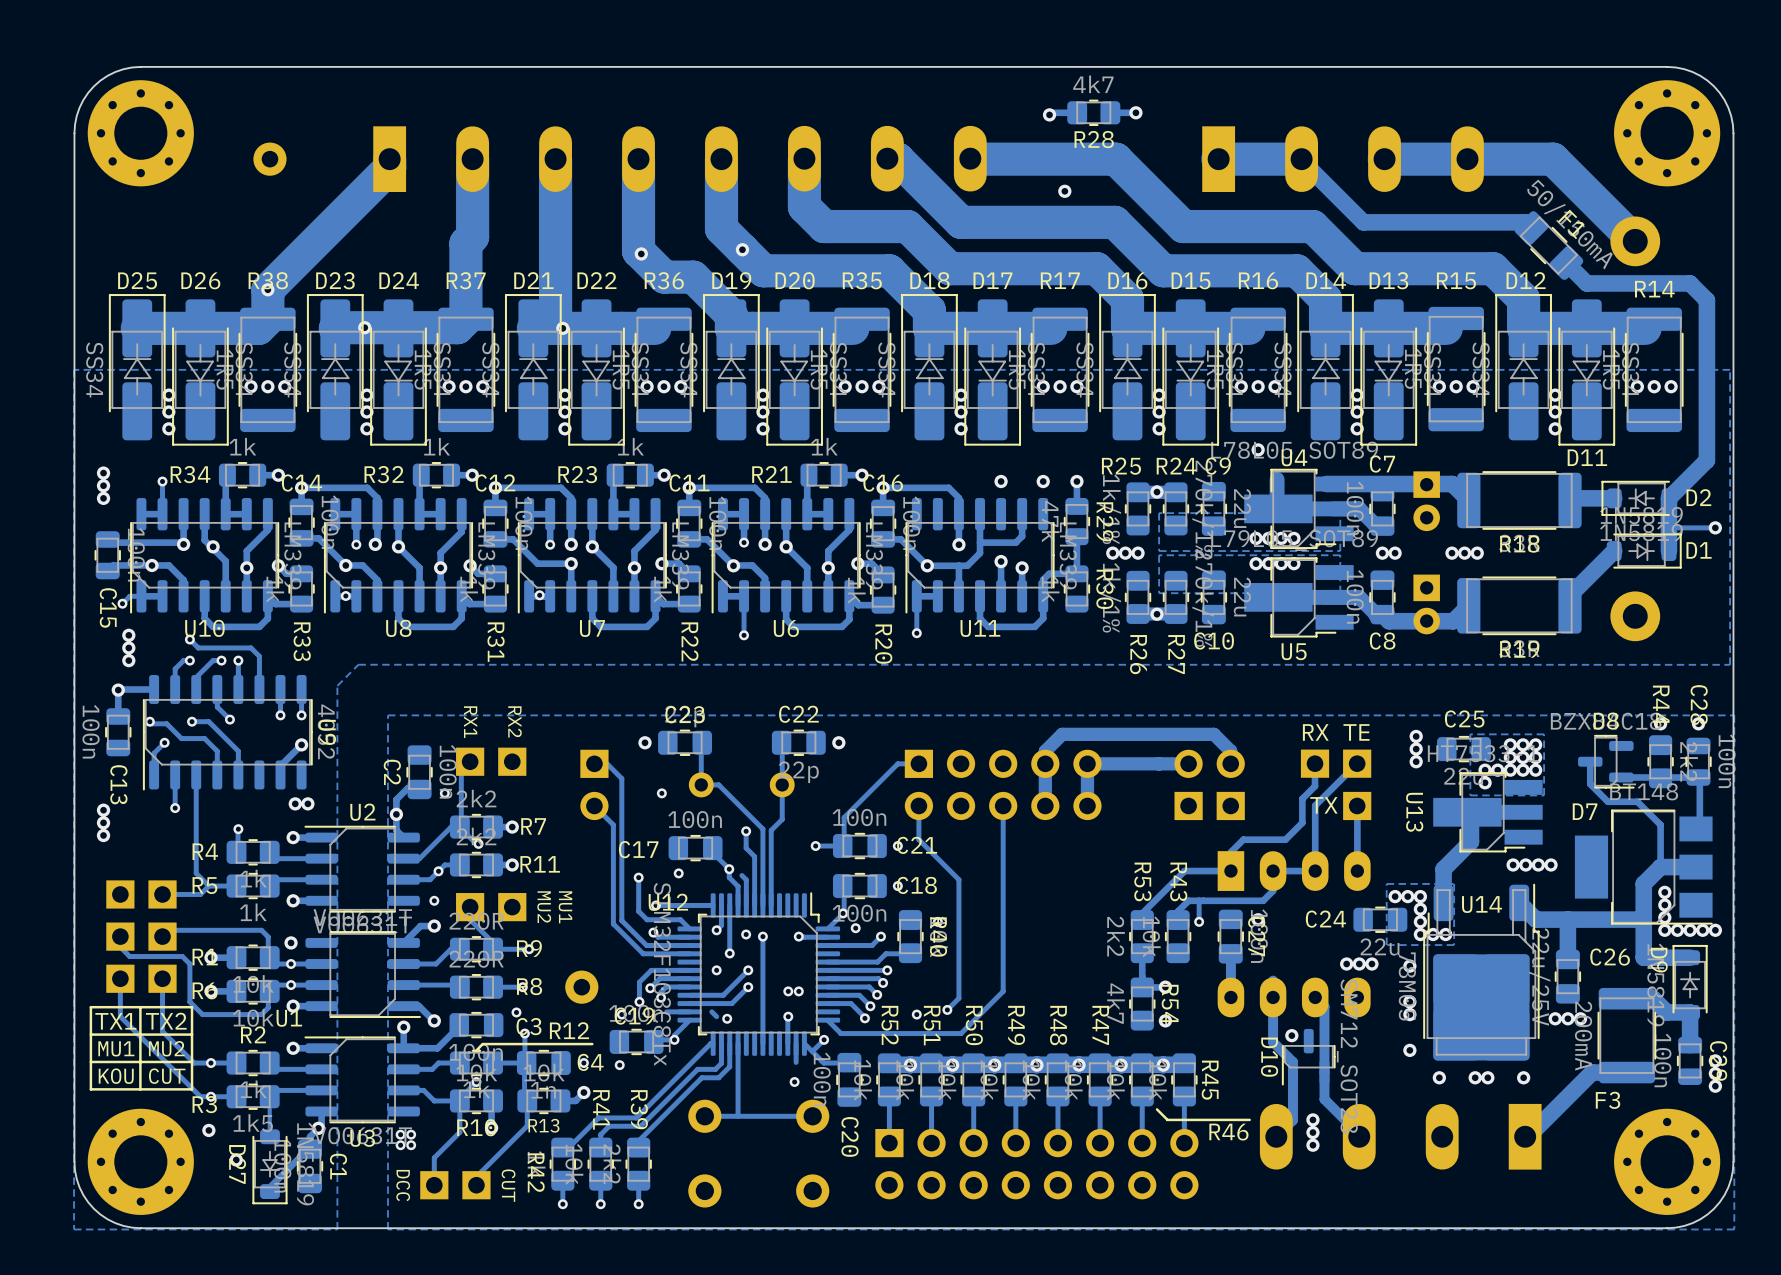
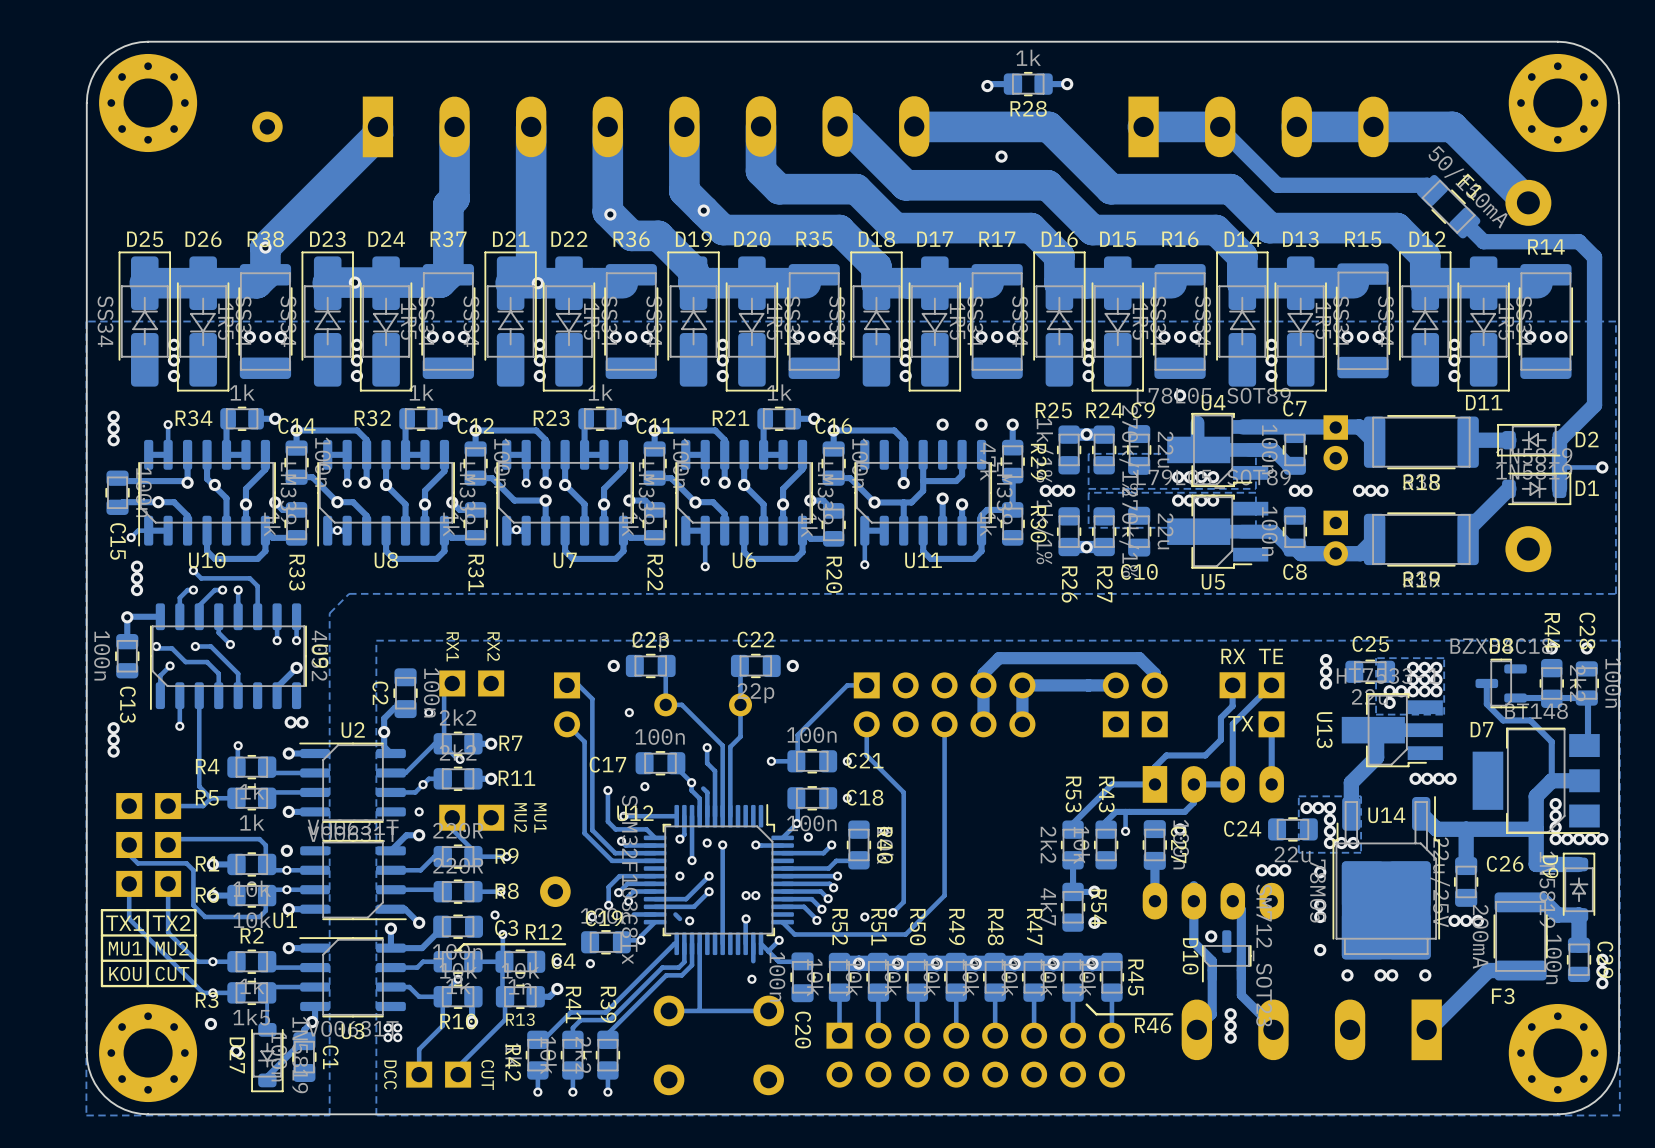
R28 value: 4k7 (1093, 84) -> 1k (1028, 57)

